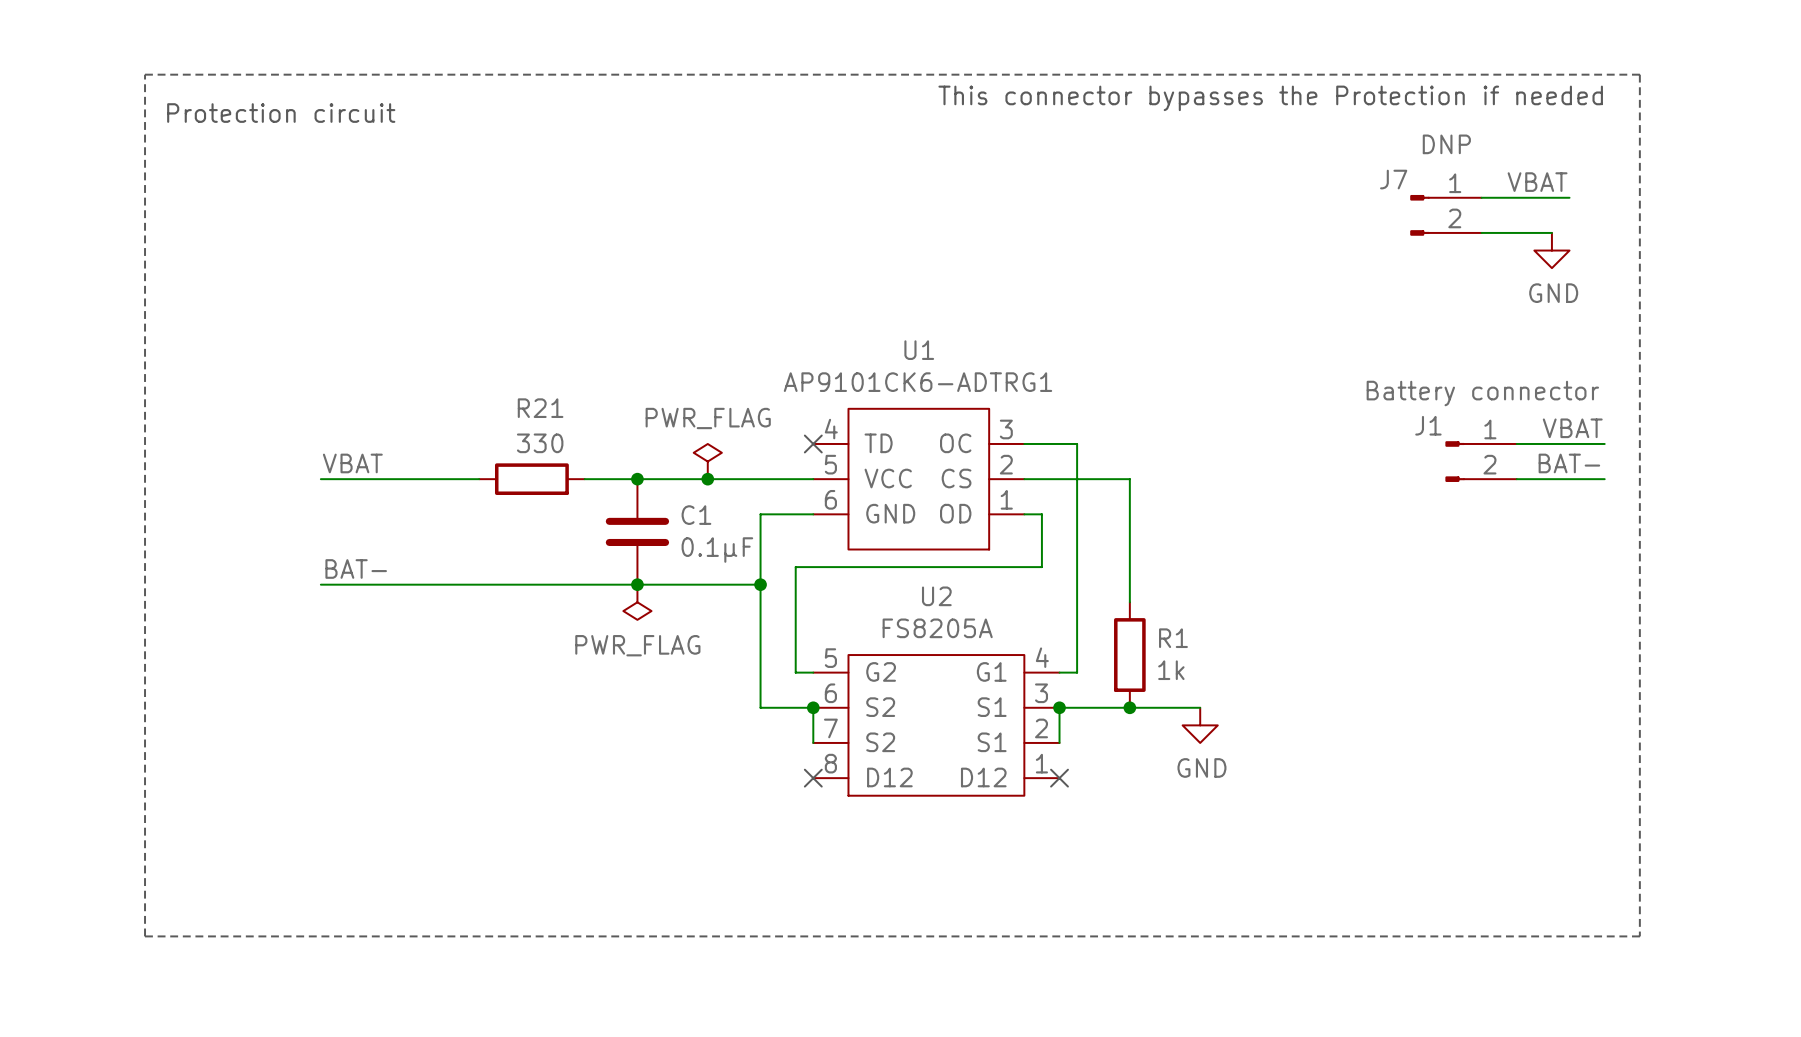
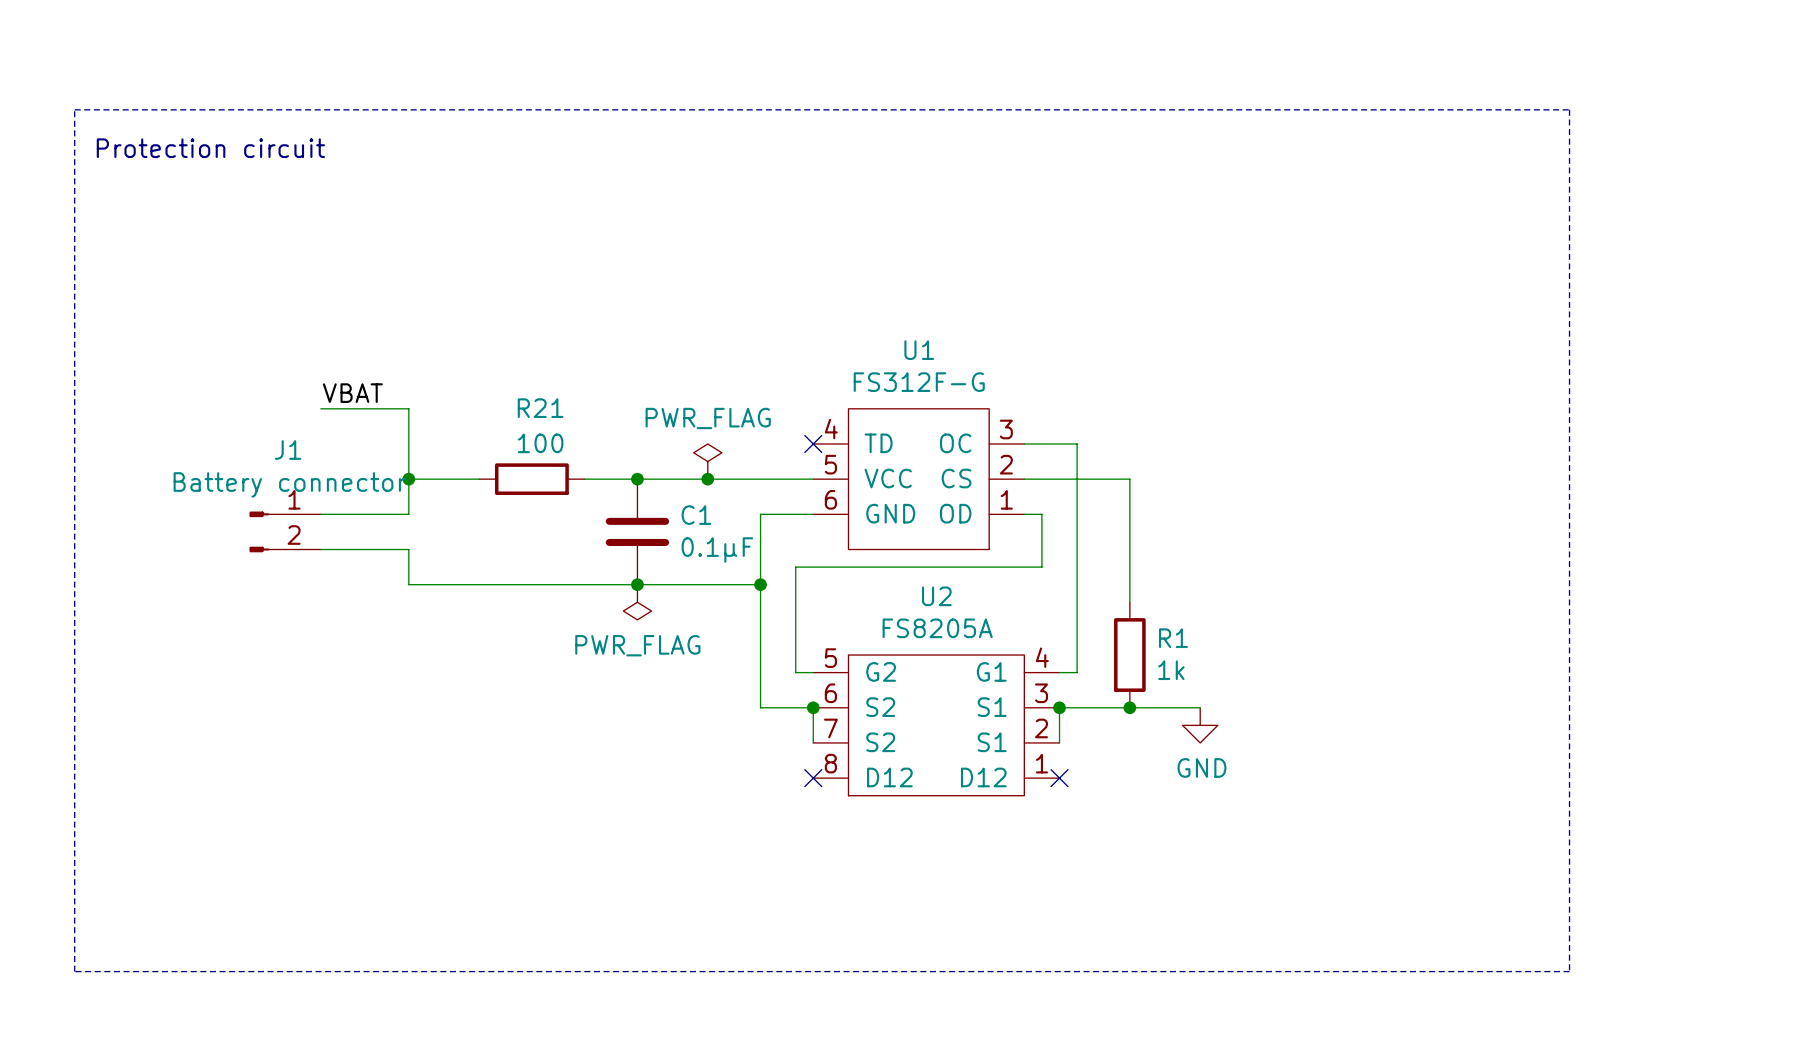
line: (145, 74) (145, 936) (1639, 936) (1639, 74) (145, 74) -> (74, 109) (74, 971) (1569, 971) (1569, 109) (74, 109)
text: This connector bypasses the Protection if needed (1270, 98) -> none
text position: Protection circuit (281, 113) -> Protection circuit (210, 148)
label: VBAT (1537, 182) -> none
wire: (1481, 197) (1569, 197) -> none
J7: DNP (1445, 215) -> none
wire: (1481, 232) (1551, 232) -> none
power symbol: GND (1551, 250) -> none
U1 value: AP9101CK6-ADTRG1 (917, 382) -> FS312F-G (919, 382)
J1 value position: Battery connector (1482, 393) -> Battery connector (289, 484)
wire: none -> (320, 408) (408, 408) (408, 514) (320, 514)
J1 name position: J1 (1428, 425) -> J1 (288, 450)
label: VBAT (1572, 428) -> none
R21 value: 330 (540, 443) -> 100 (540, 443)
wire: (1516, 443) (1604, 443) -> none
J1 position: (1481, 461) -> (285, 531)
label position: VBAT (352, 463) -> VBAT (352, 393)
label: BAT- (1569, 463) -> none
junction: none -> (408, 479)
wire: (1516, 479) (1604, 479) -> none
label: BAT- (356, 568) -> none
wire: (320, 584) (408, 584) -> (320, 549) (408, 549) (408, 584)

